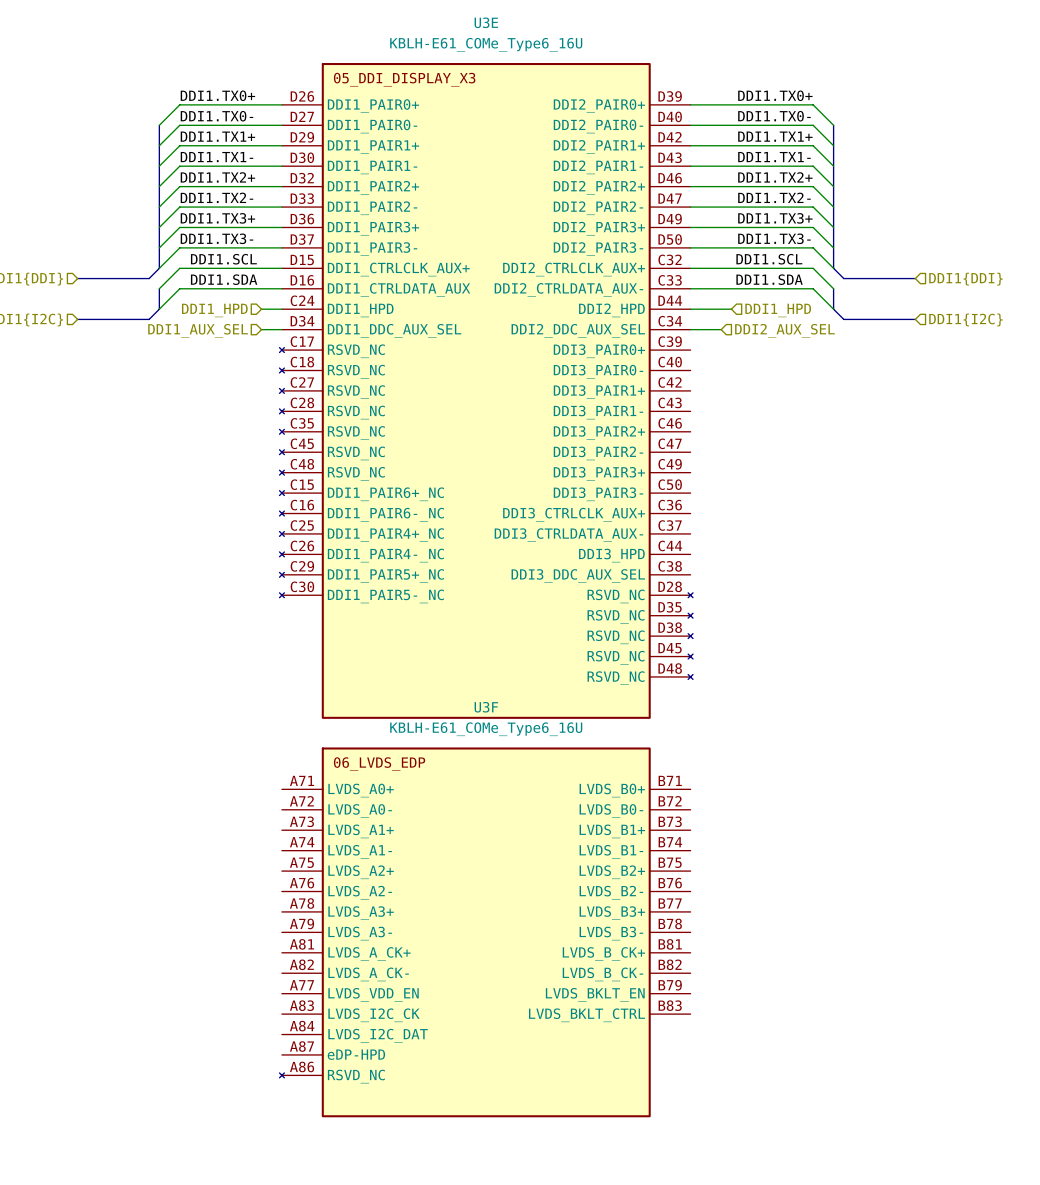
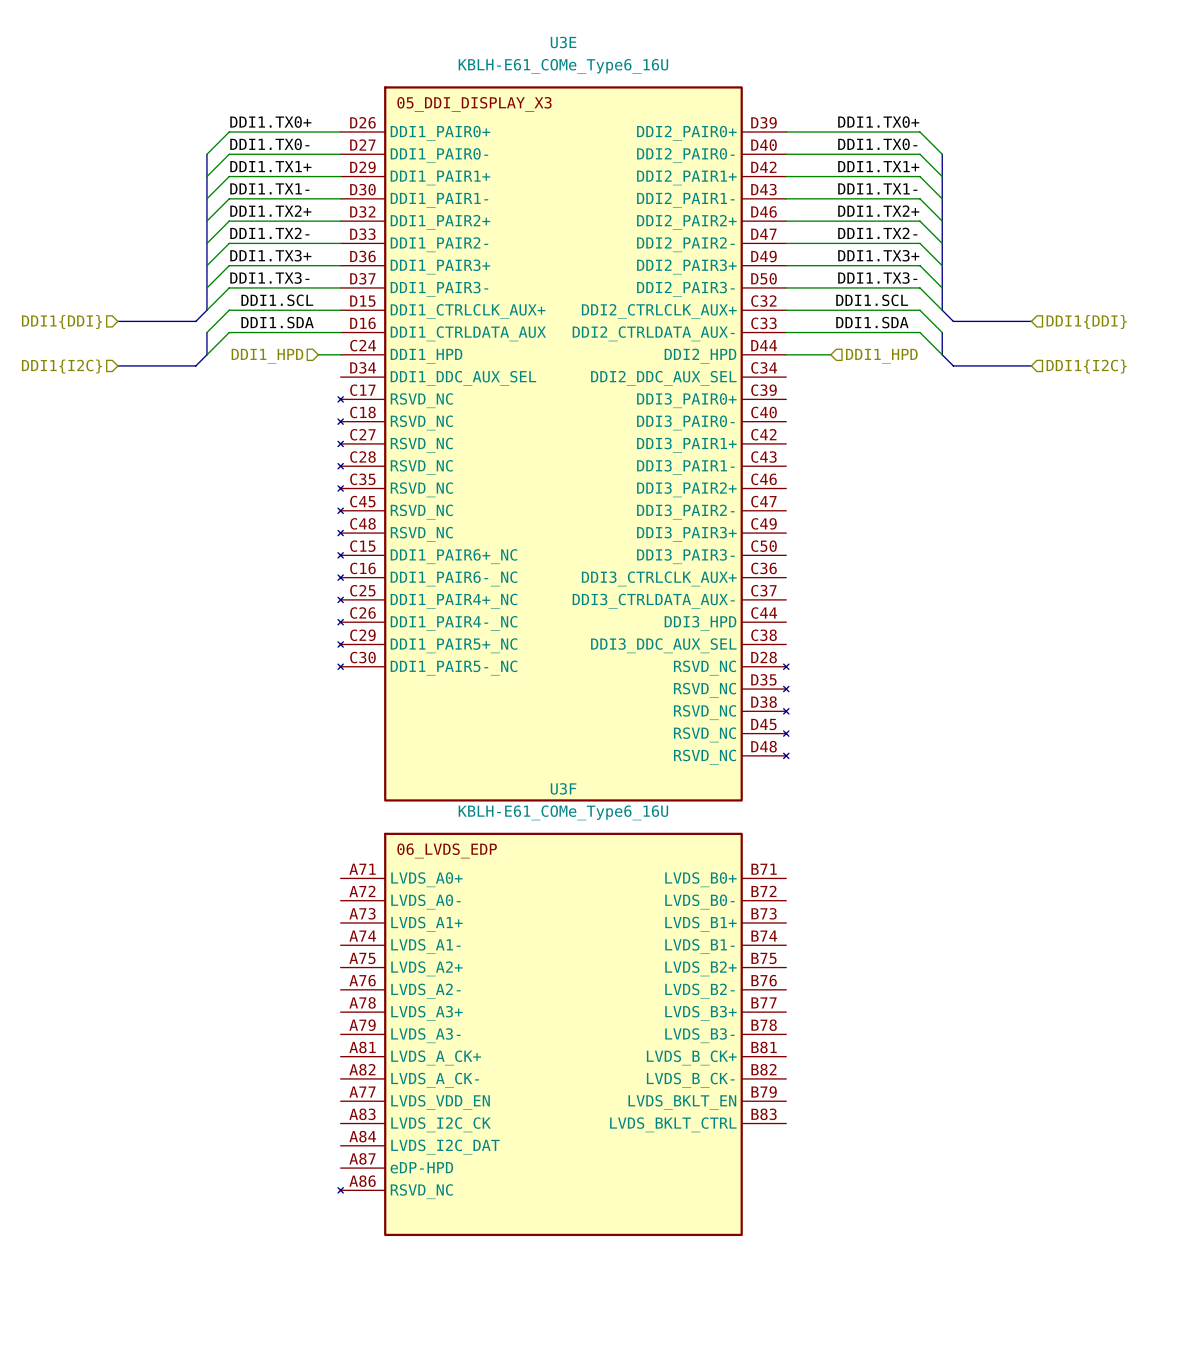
wire: (261, 329) (281, 329) -> none
wire: (690, 329) (721, 329) -> none
hierarchical label: DDI1_AUX_SEL (198, 330) -> none
hierarchical label: DDI2_AUX_SEL (784, 330) -> none

